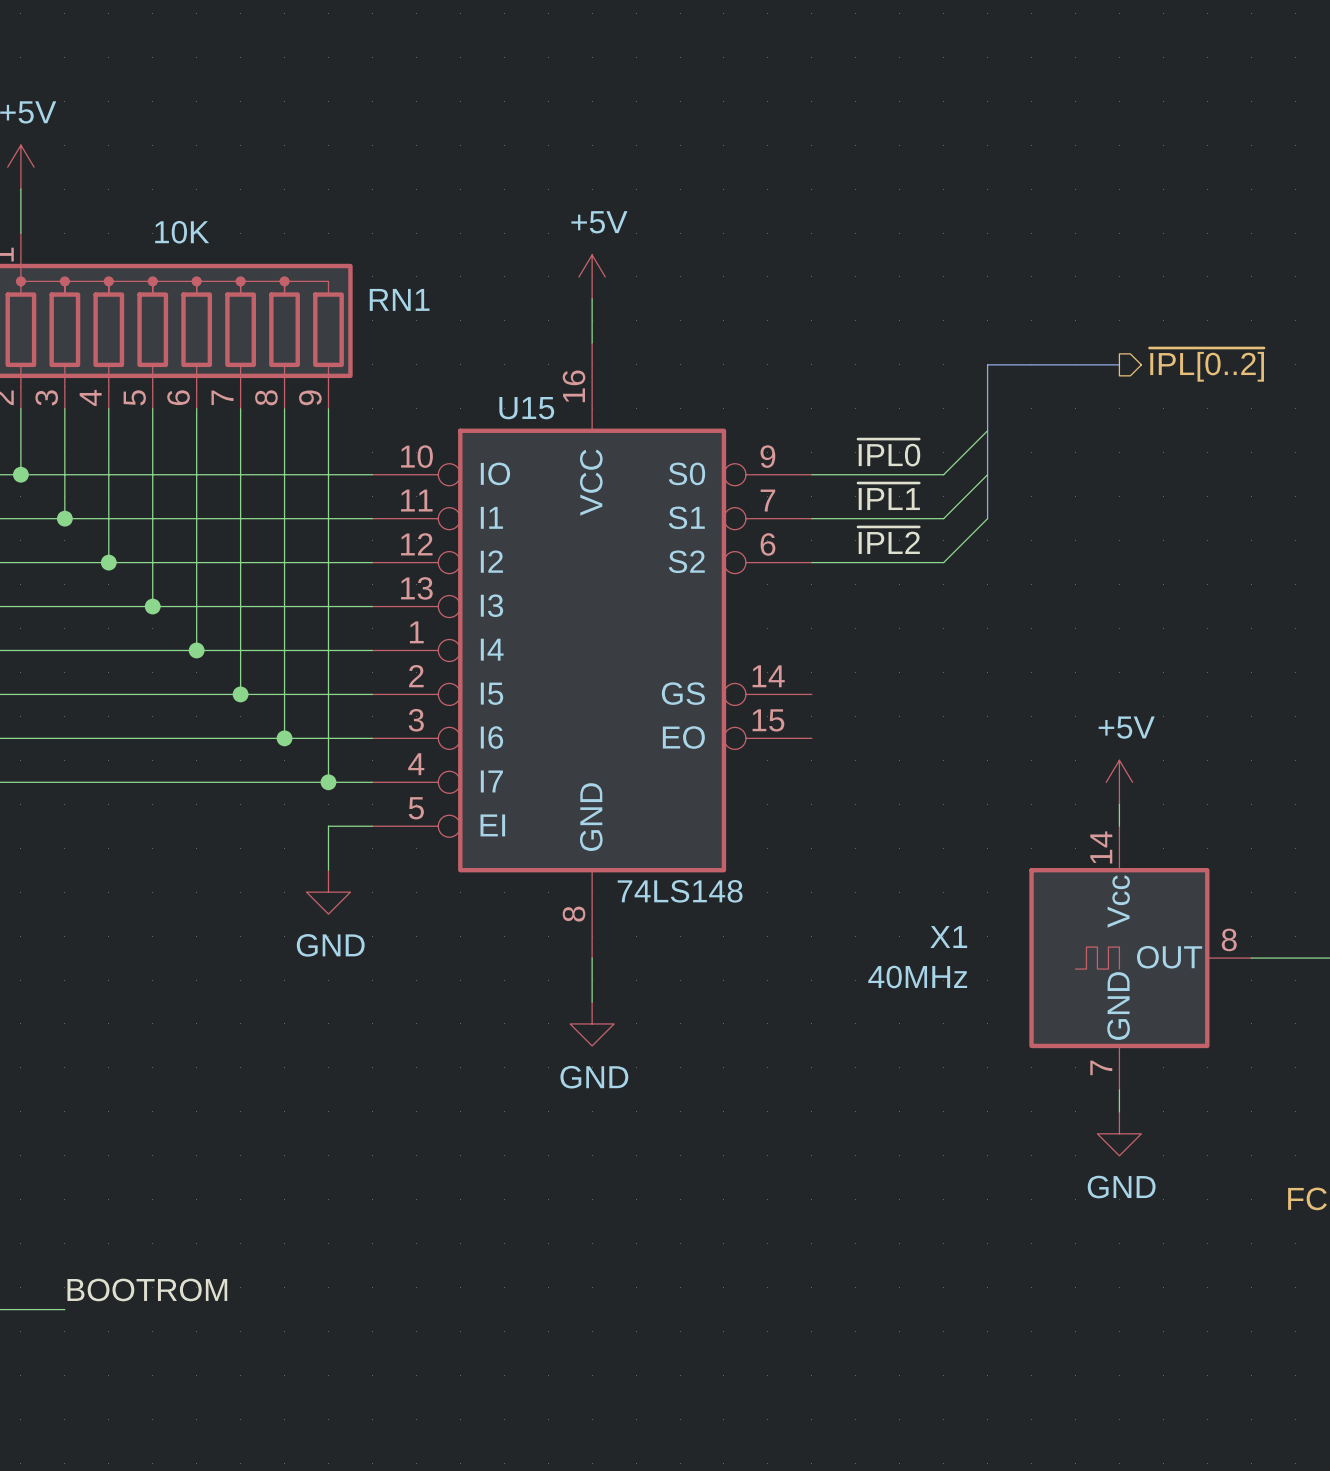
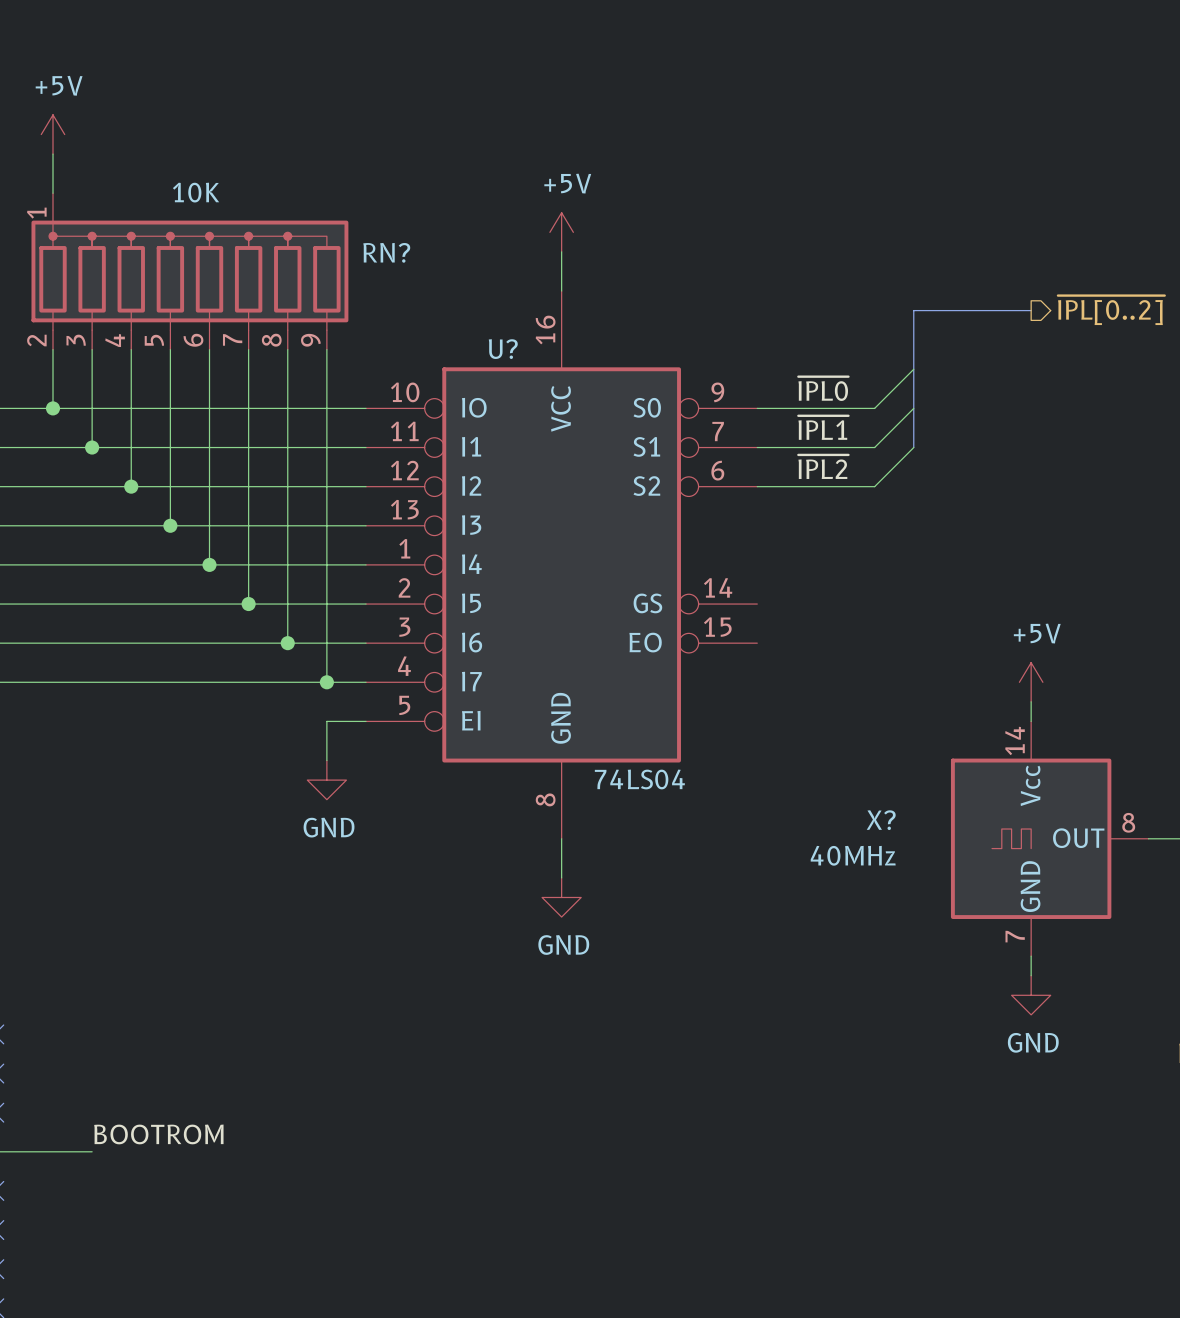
RN1 name: RN1 (399, 299) -> RN? (386, 252)
U15 name: U15 (526, 408) -> U? (503, 349)
U15 value: 74LS148 (680, 891) -> 74LS04 (639, 779)
X1 name: X1 (948, 937) -> X? (881, 820)

